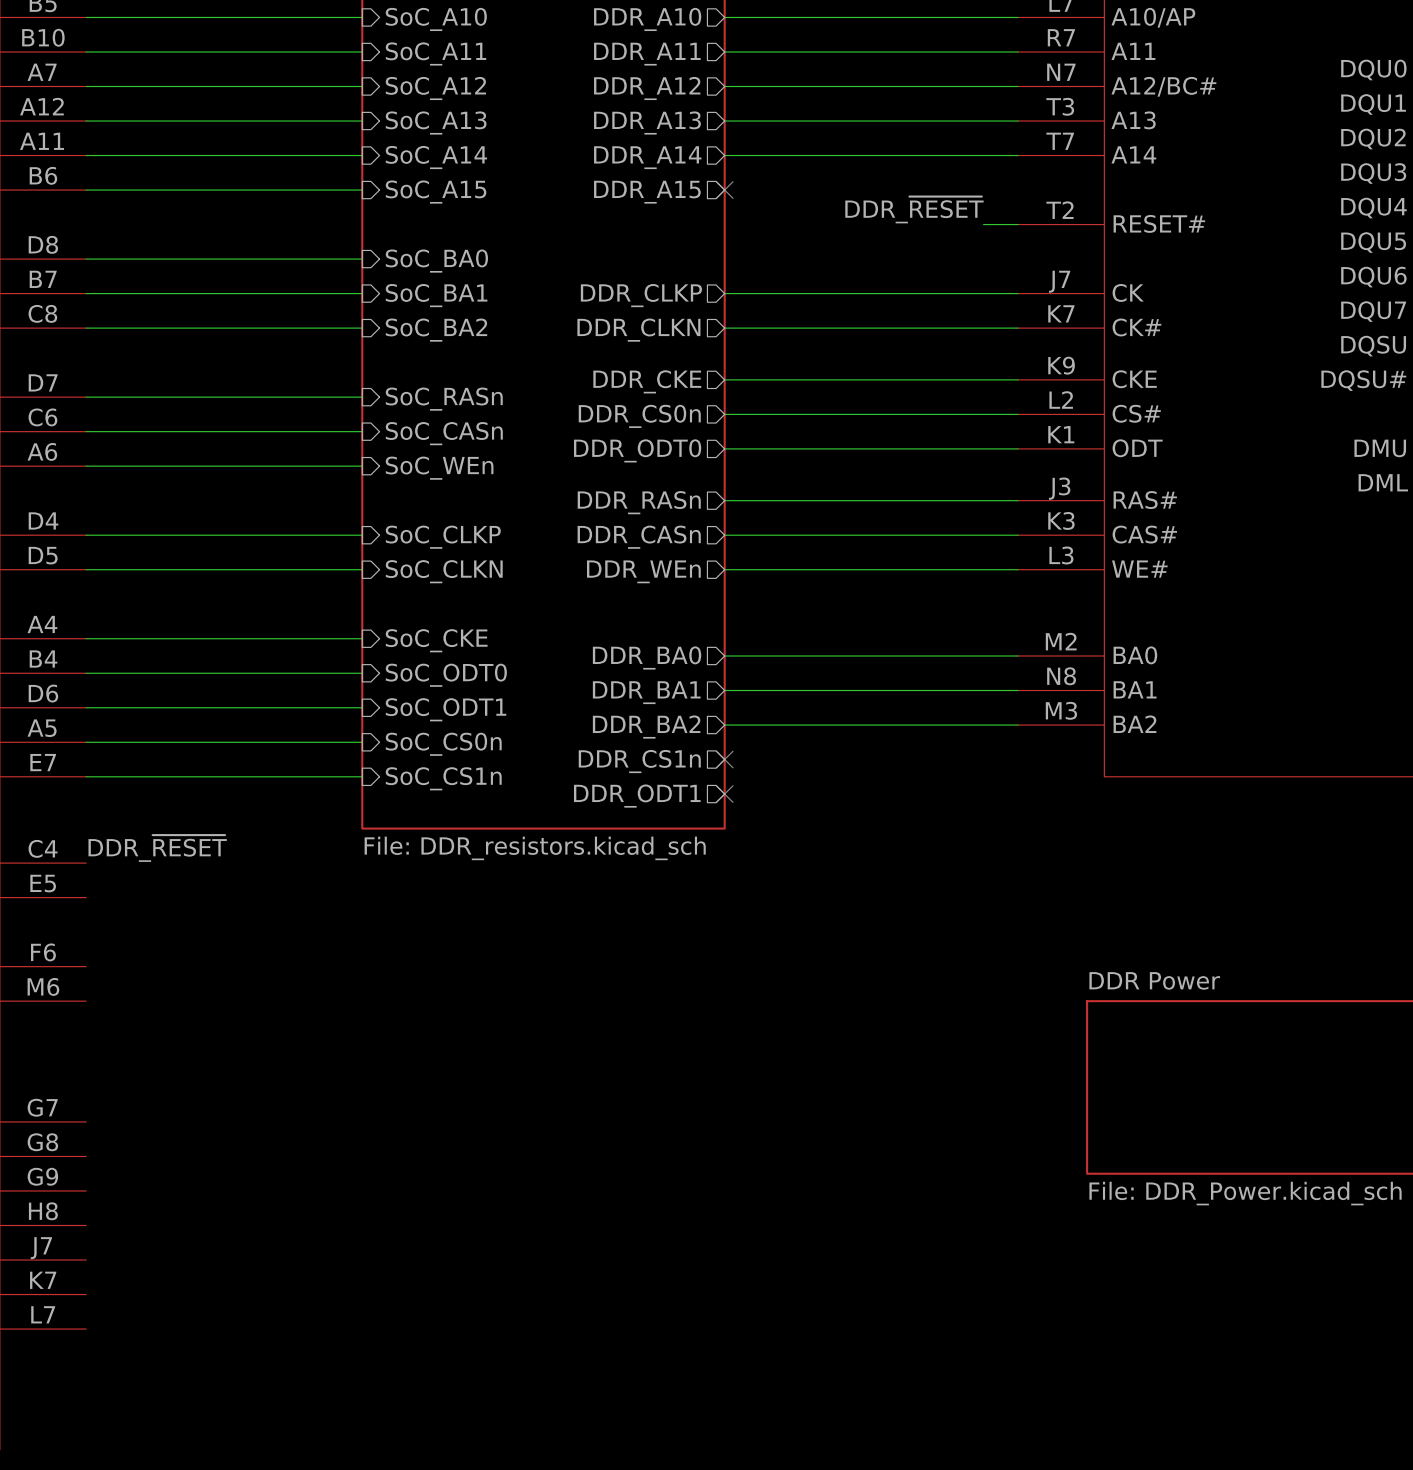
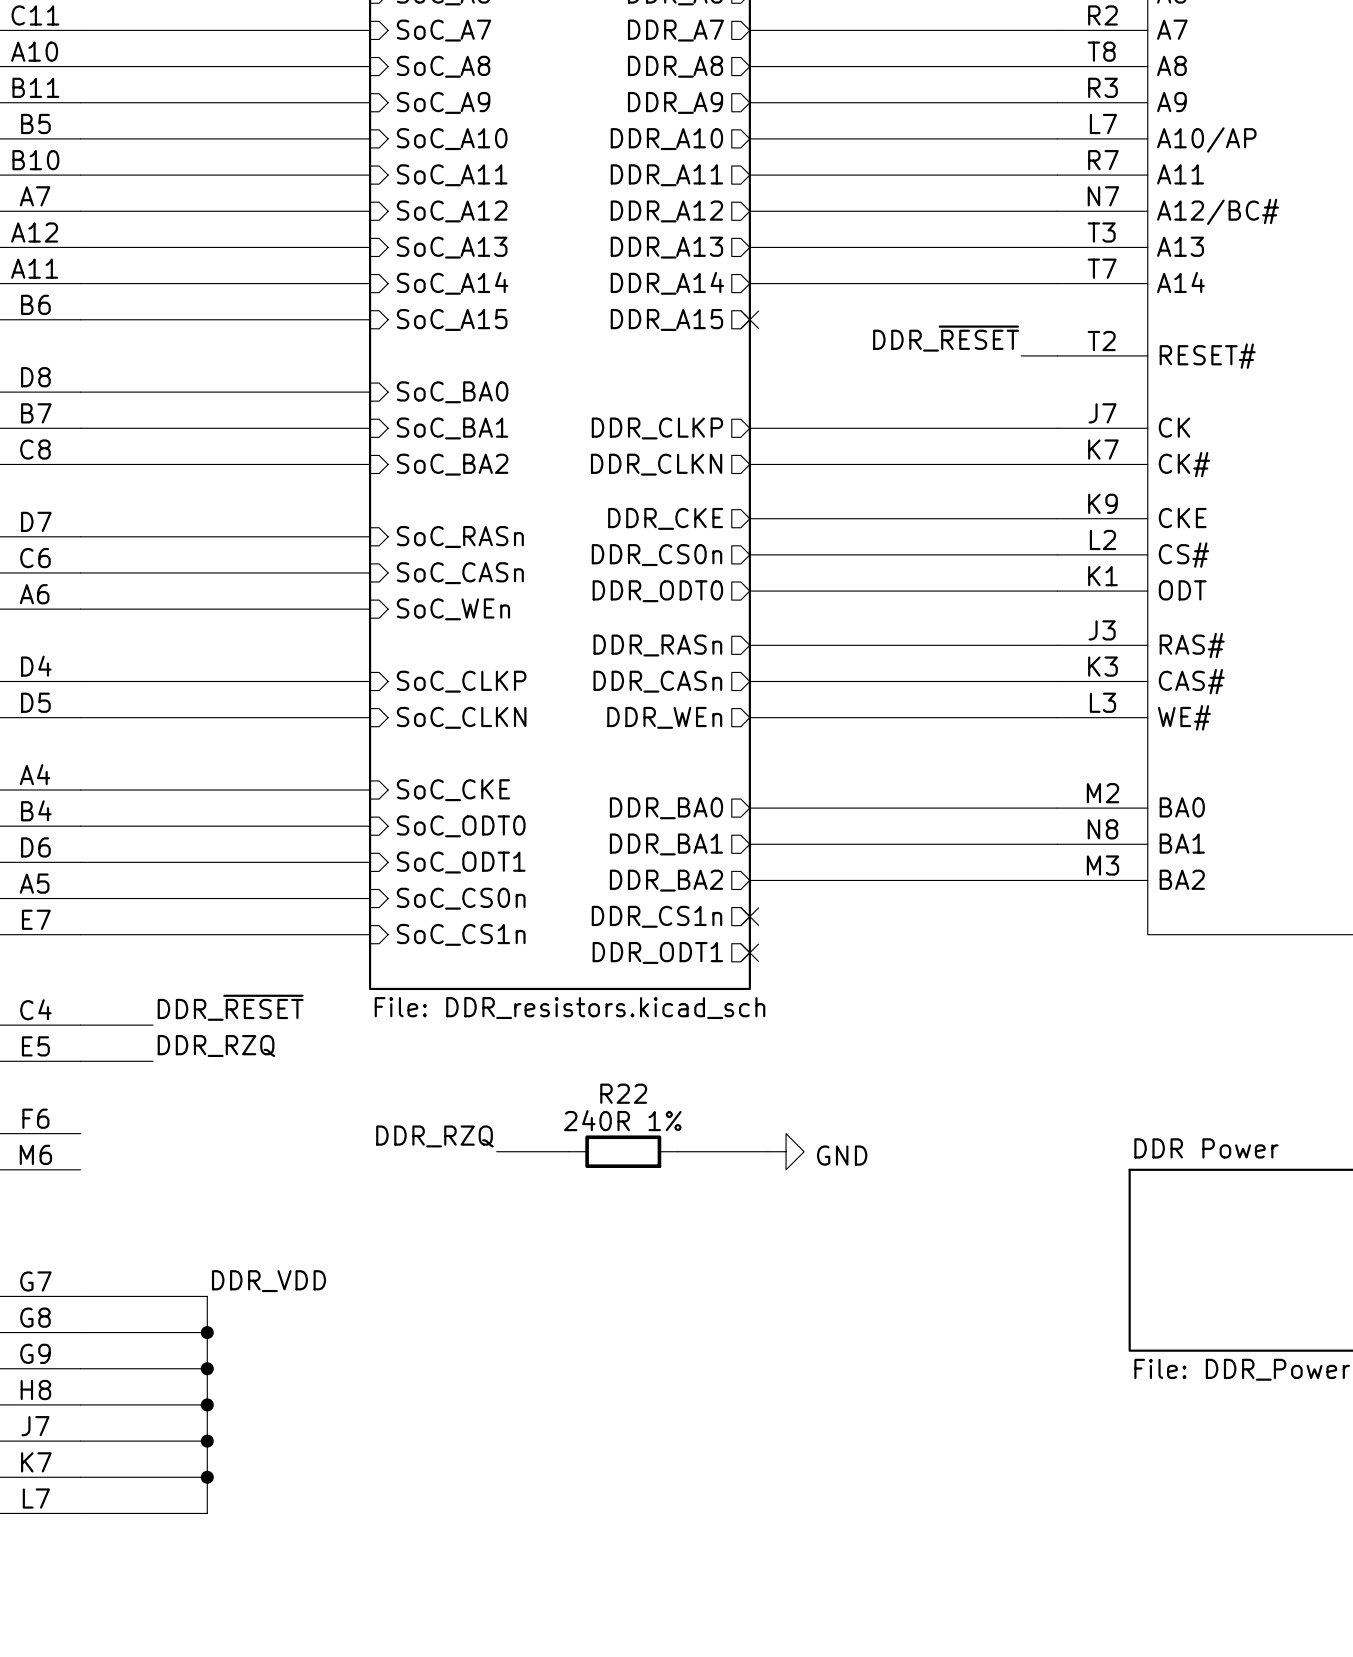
label position: DDR_~{RESET} (157, 848) -> DDR_~{RESET} (230, 1007)
wire: none -> (80, 1025) (153, 1025)
label: none -> DDR_RZQ (216, 1046)
wire: none -> (80, 1061) (153, 1061)
label: none -> DDR_RZQ (434, 1136)
wire: none -> (496, 1151) (569, 1151)
R22: none -> 240R 1% (623, 1151)
wire: none -> (677, 1151) (767, 1151)
power symbol: none -> GND (786, 1151)
label: none -> DDR_VDD (269, 1281)
wire: none -> (80, 1296) (207, 1296) (207, 1513) (80, 1513)
wire: none -> (80, 1332) (207, 1332)
junction: none -> (207, 1332)
wire: none -> (80, 1368) (207, 1368)
junction: none -> (207, 1368)
wire: none -> (80, 1404) (207, 1404)
junction: none -> (207, 1404)
wire: none -> (80, 1441) (207, 1441)
junction: none -> (207, 1441)
wire: none -> (80, 1477) (207, 1477)
junction: none -> (207, 1477)

